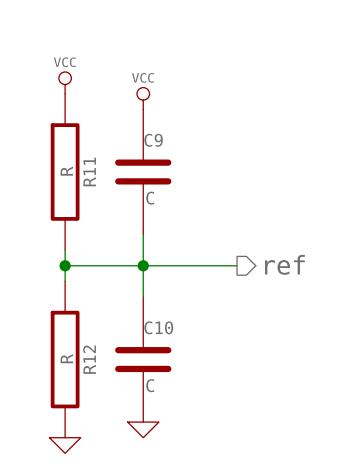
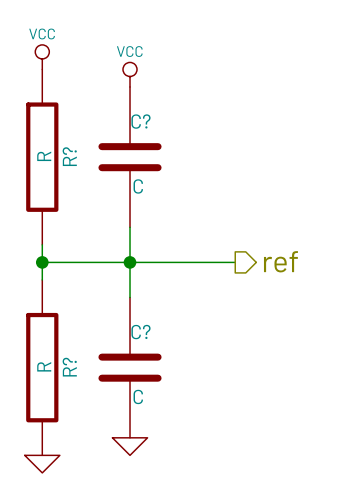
C9 name: C9 (153, 140) -> C? (141, 121)
R11 name: R11 (89, 171) -> R? (69, 156)
C10 name: C10 (158, 327) -> C? (141, 332)
R12 name: R12 (89, 359) -> R? (69, 367)

